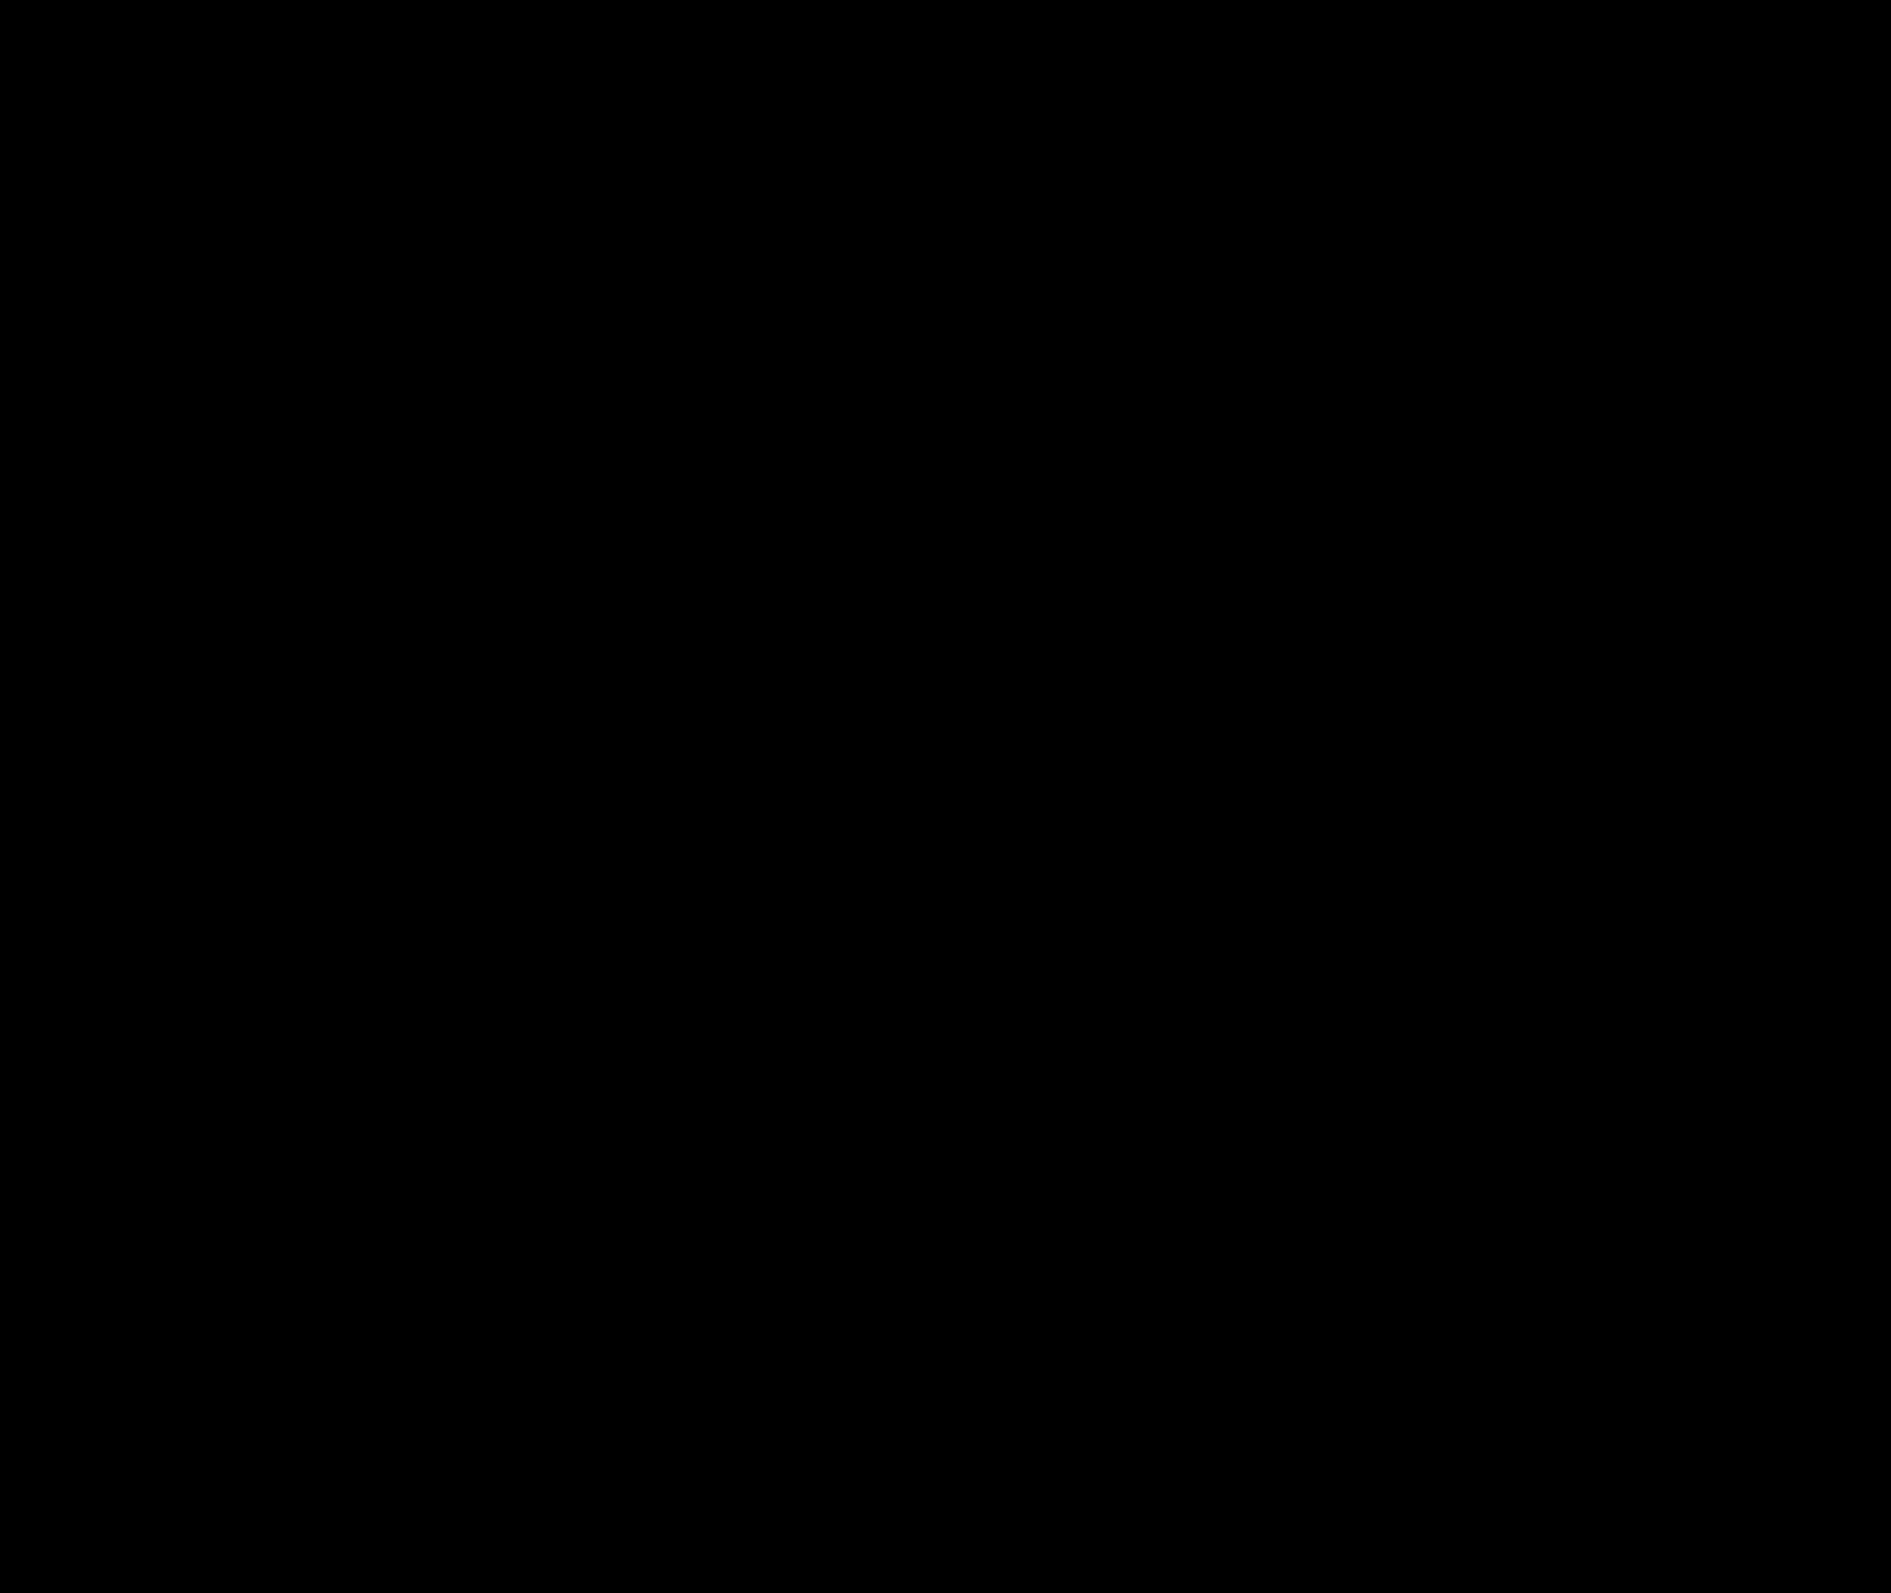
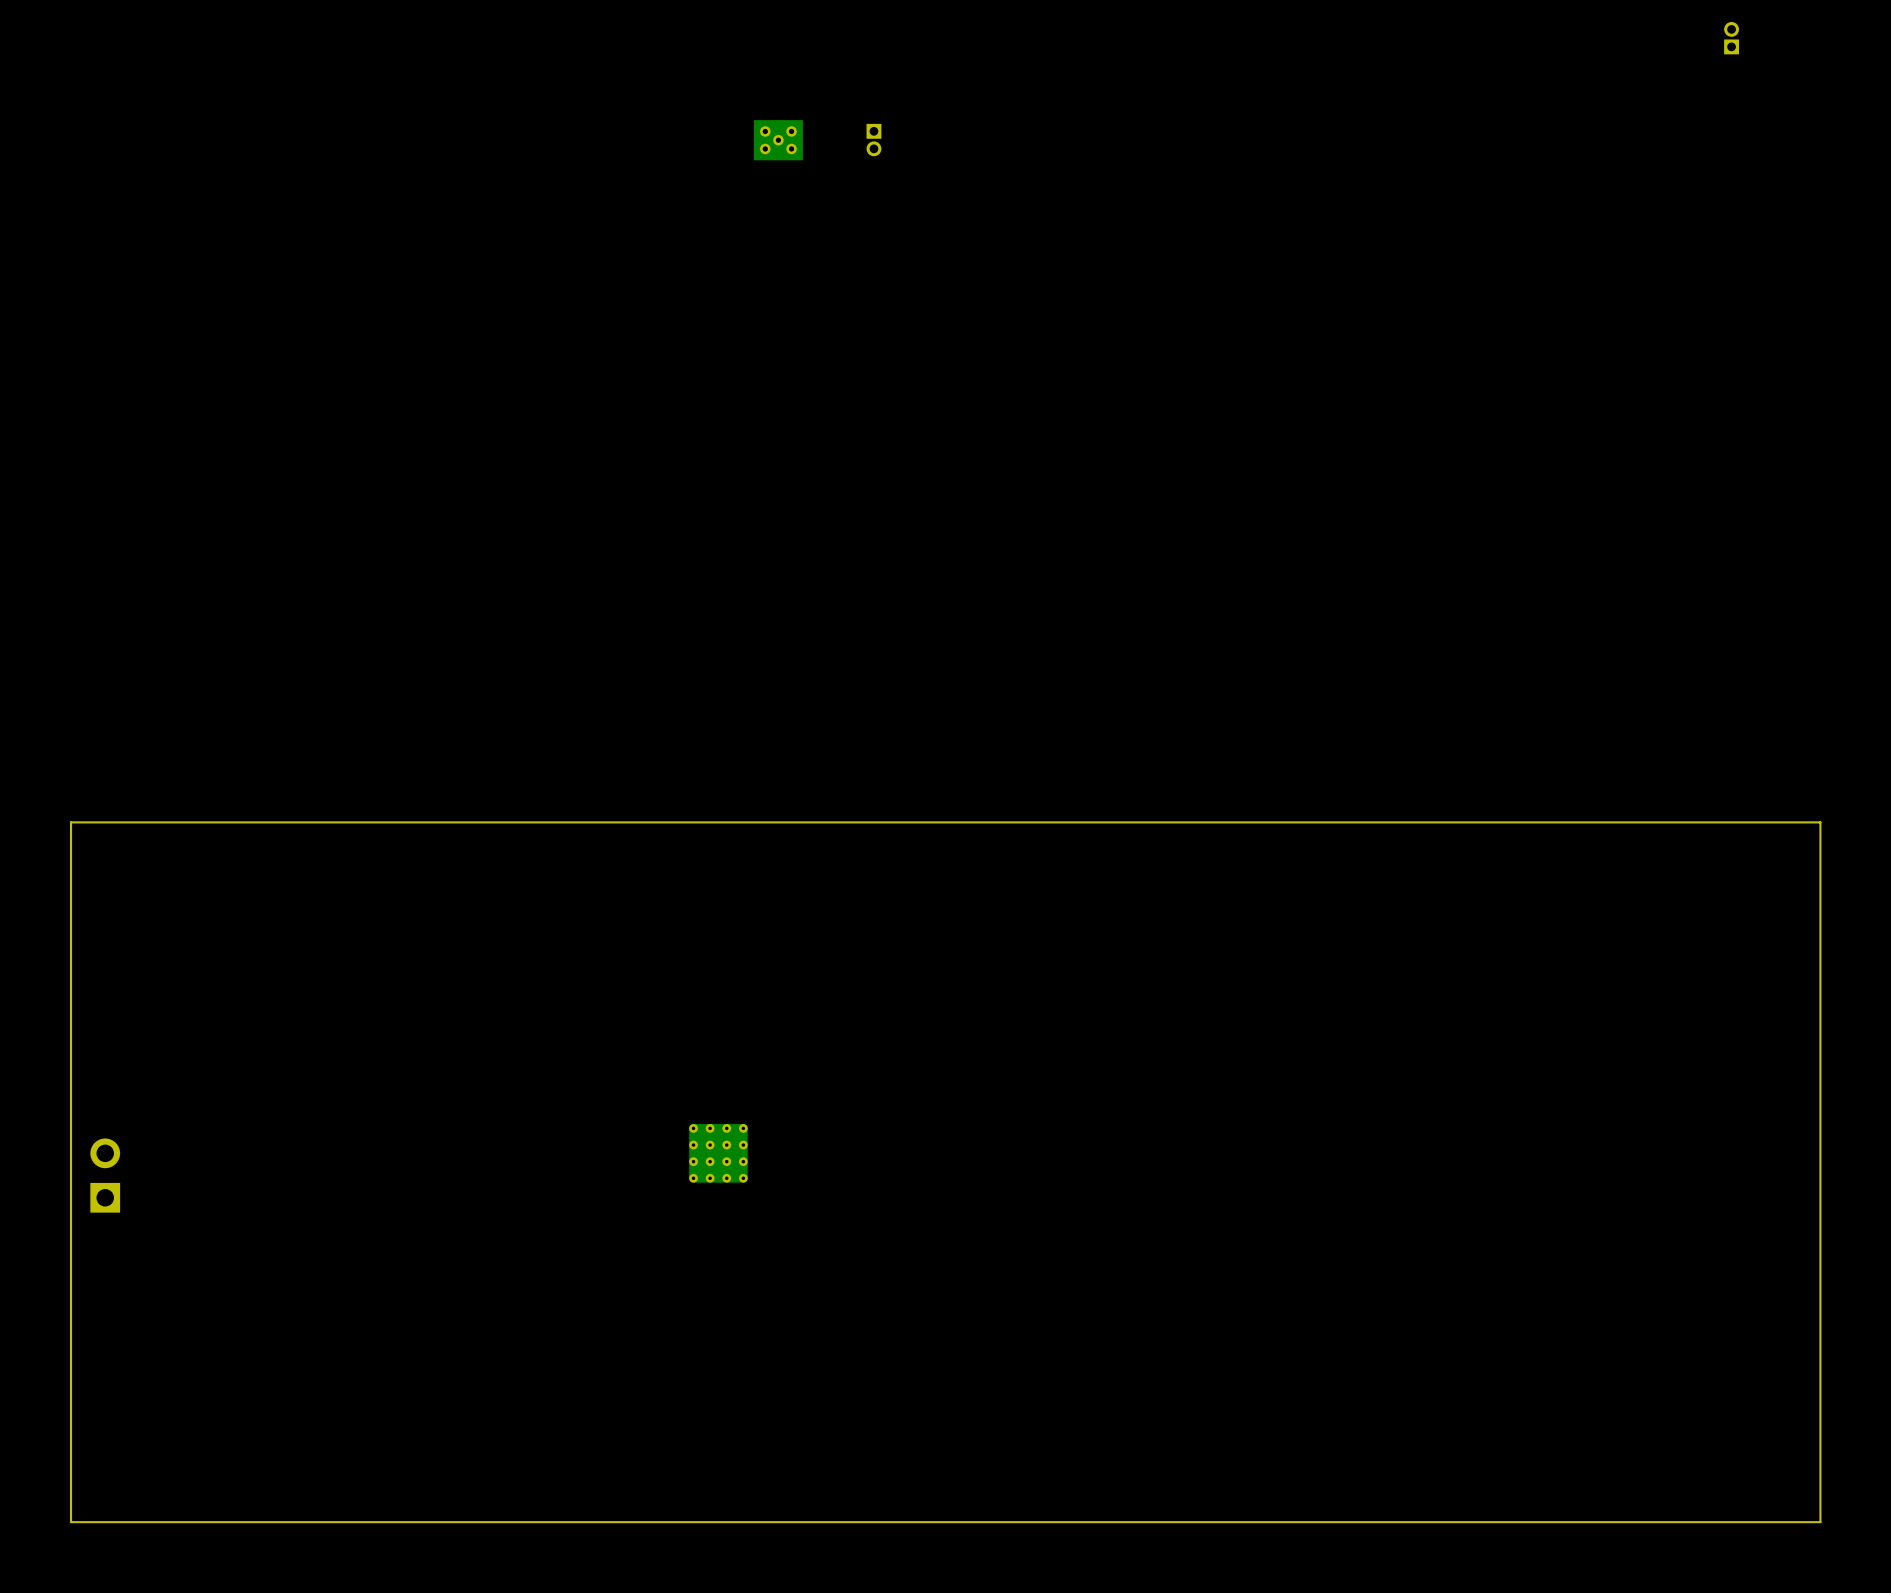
part: none -> (1731, 38)
part: none -> (778, 140)
part: none -> (873, 140)
board edge: none -> (1820, 822) (71, 822) (71, 1522) (1820, 1522) (1820, 822)
part: none -> (718, 1153)
part: none -> (105, 1175)

